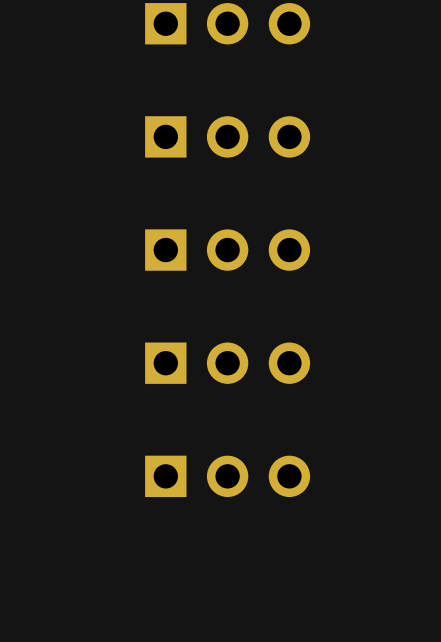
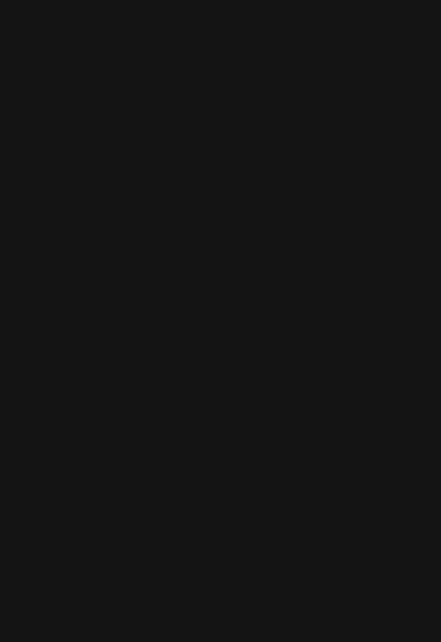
part: (227, 23) -> none
part: (227, 136) -> none
part: (227, 250) -> none
part: (227, 363) -> none
part: (227, 476) -> none

